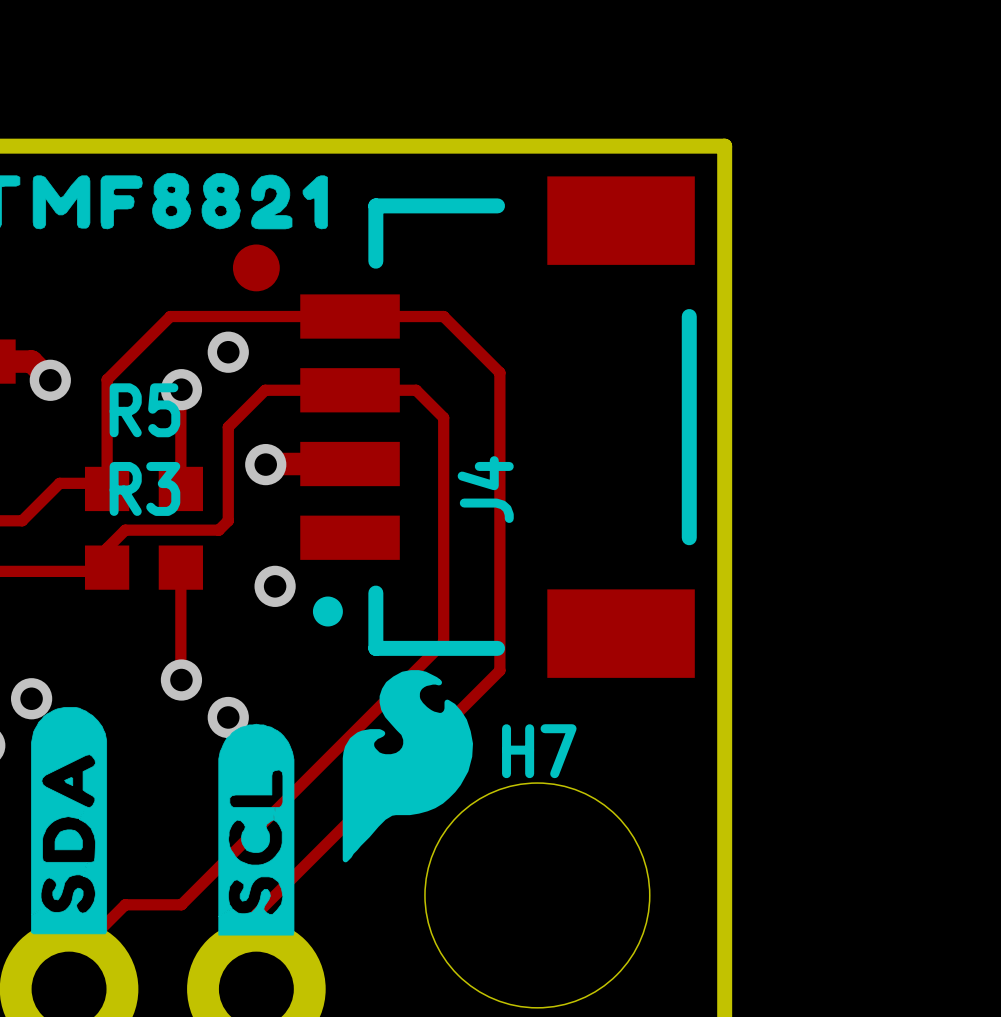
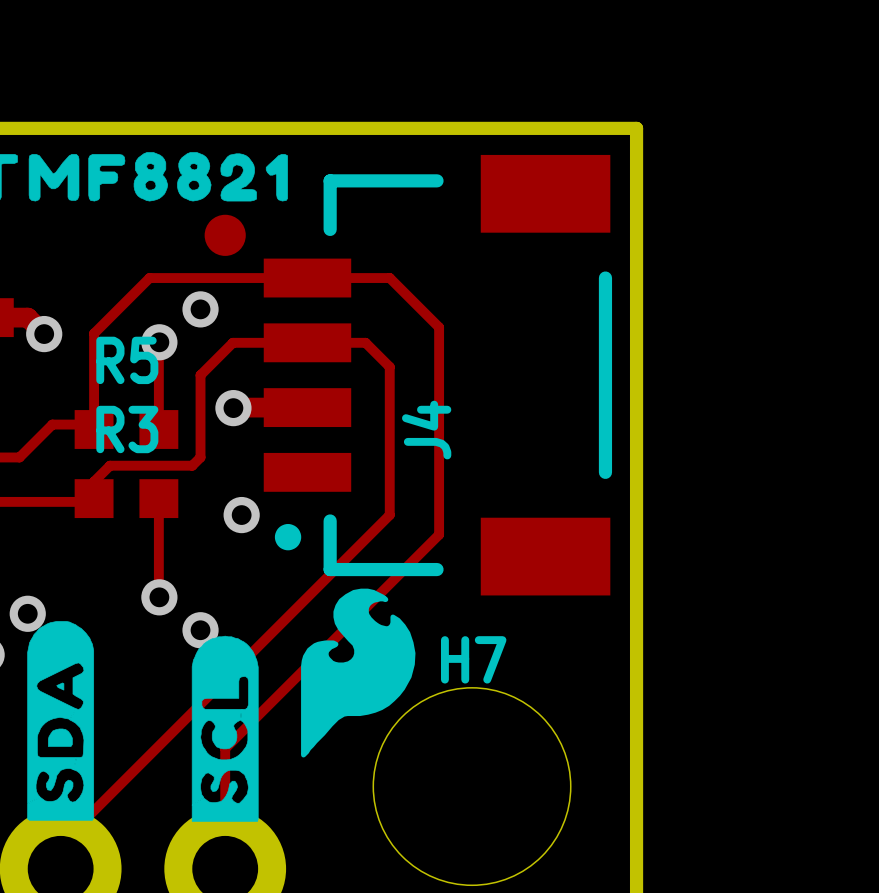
track: (443, 586) (443, 642) (181, 904) (125, 904) -> (389, 515) (110, 794)
track: (499, 608) (499, 670) (256, 914) -> (439, 534) (225, 748) (225, 803)

